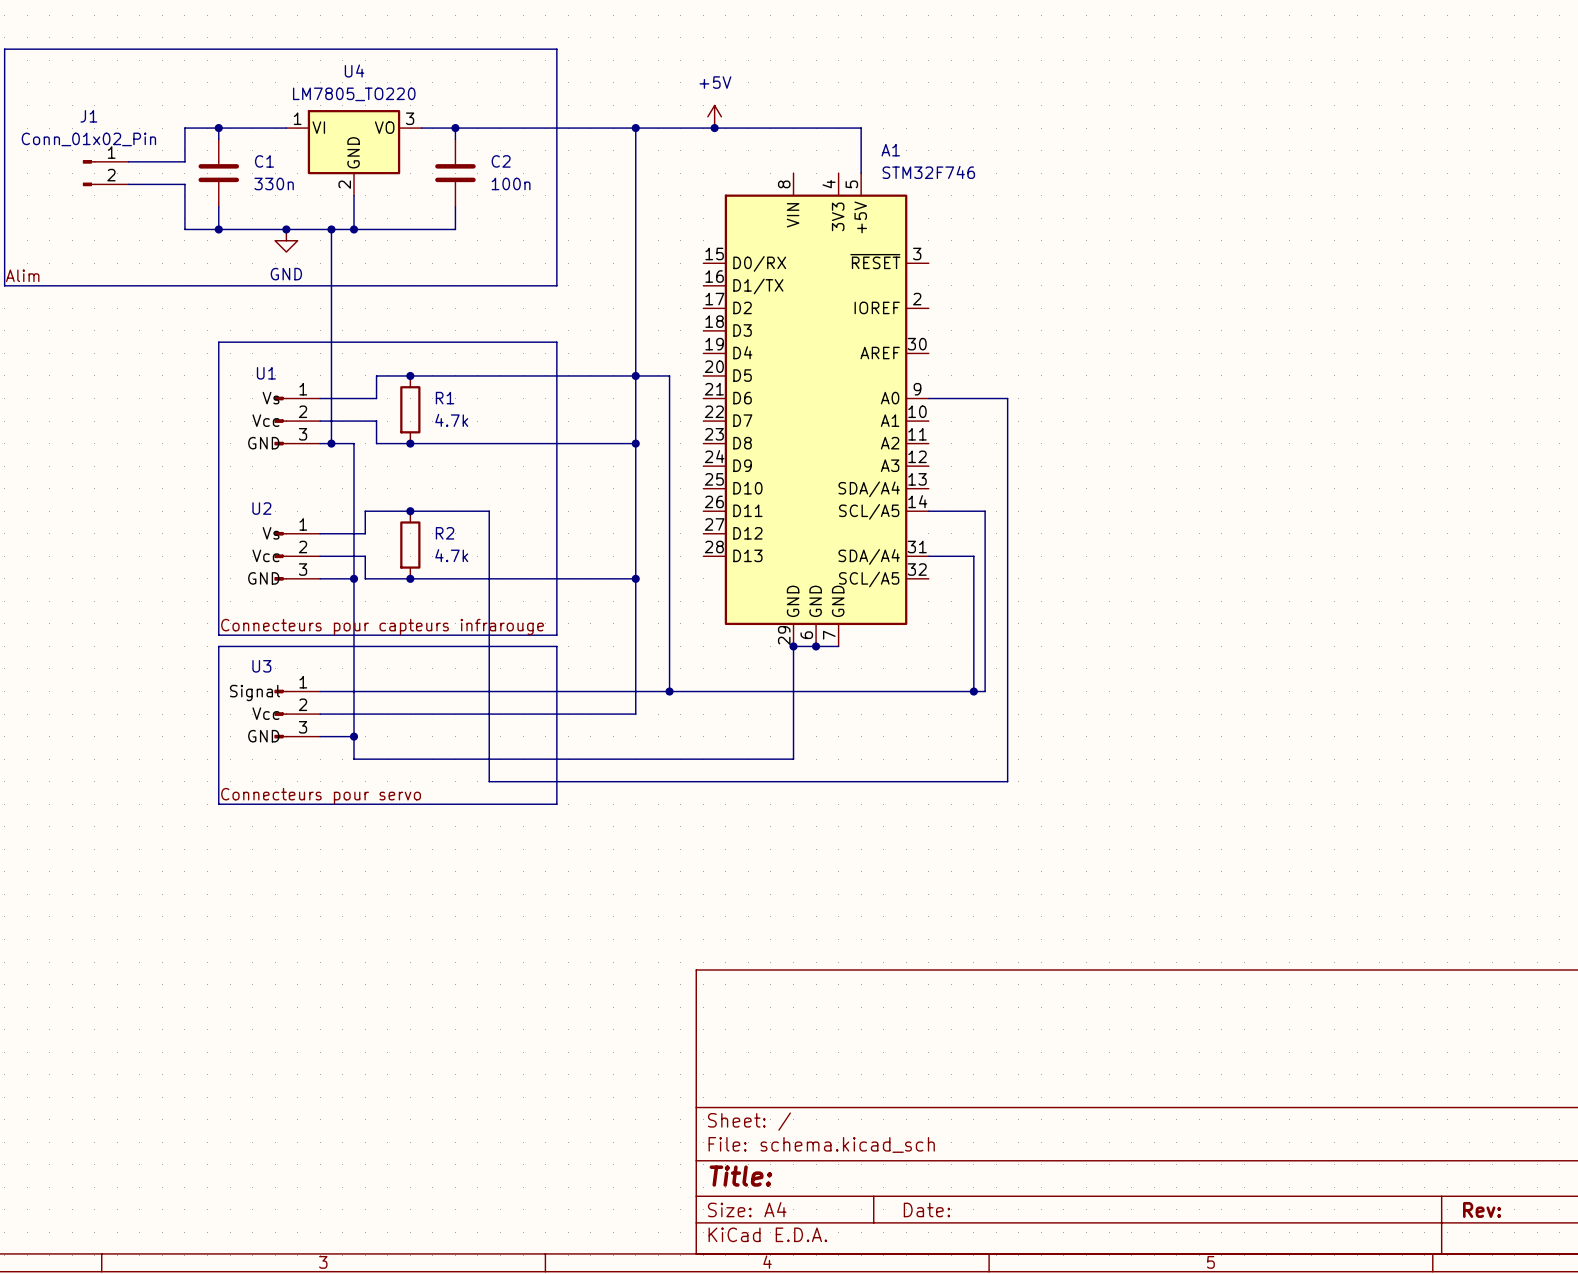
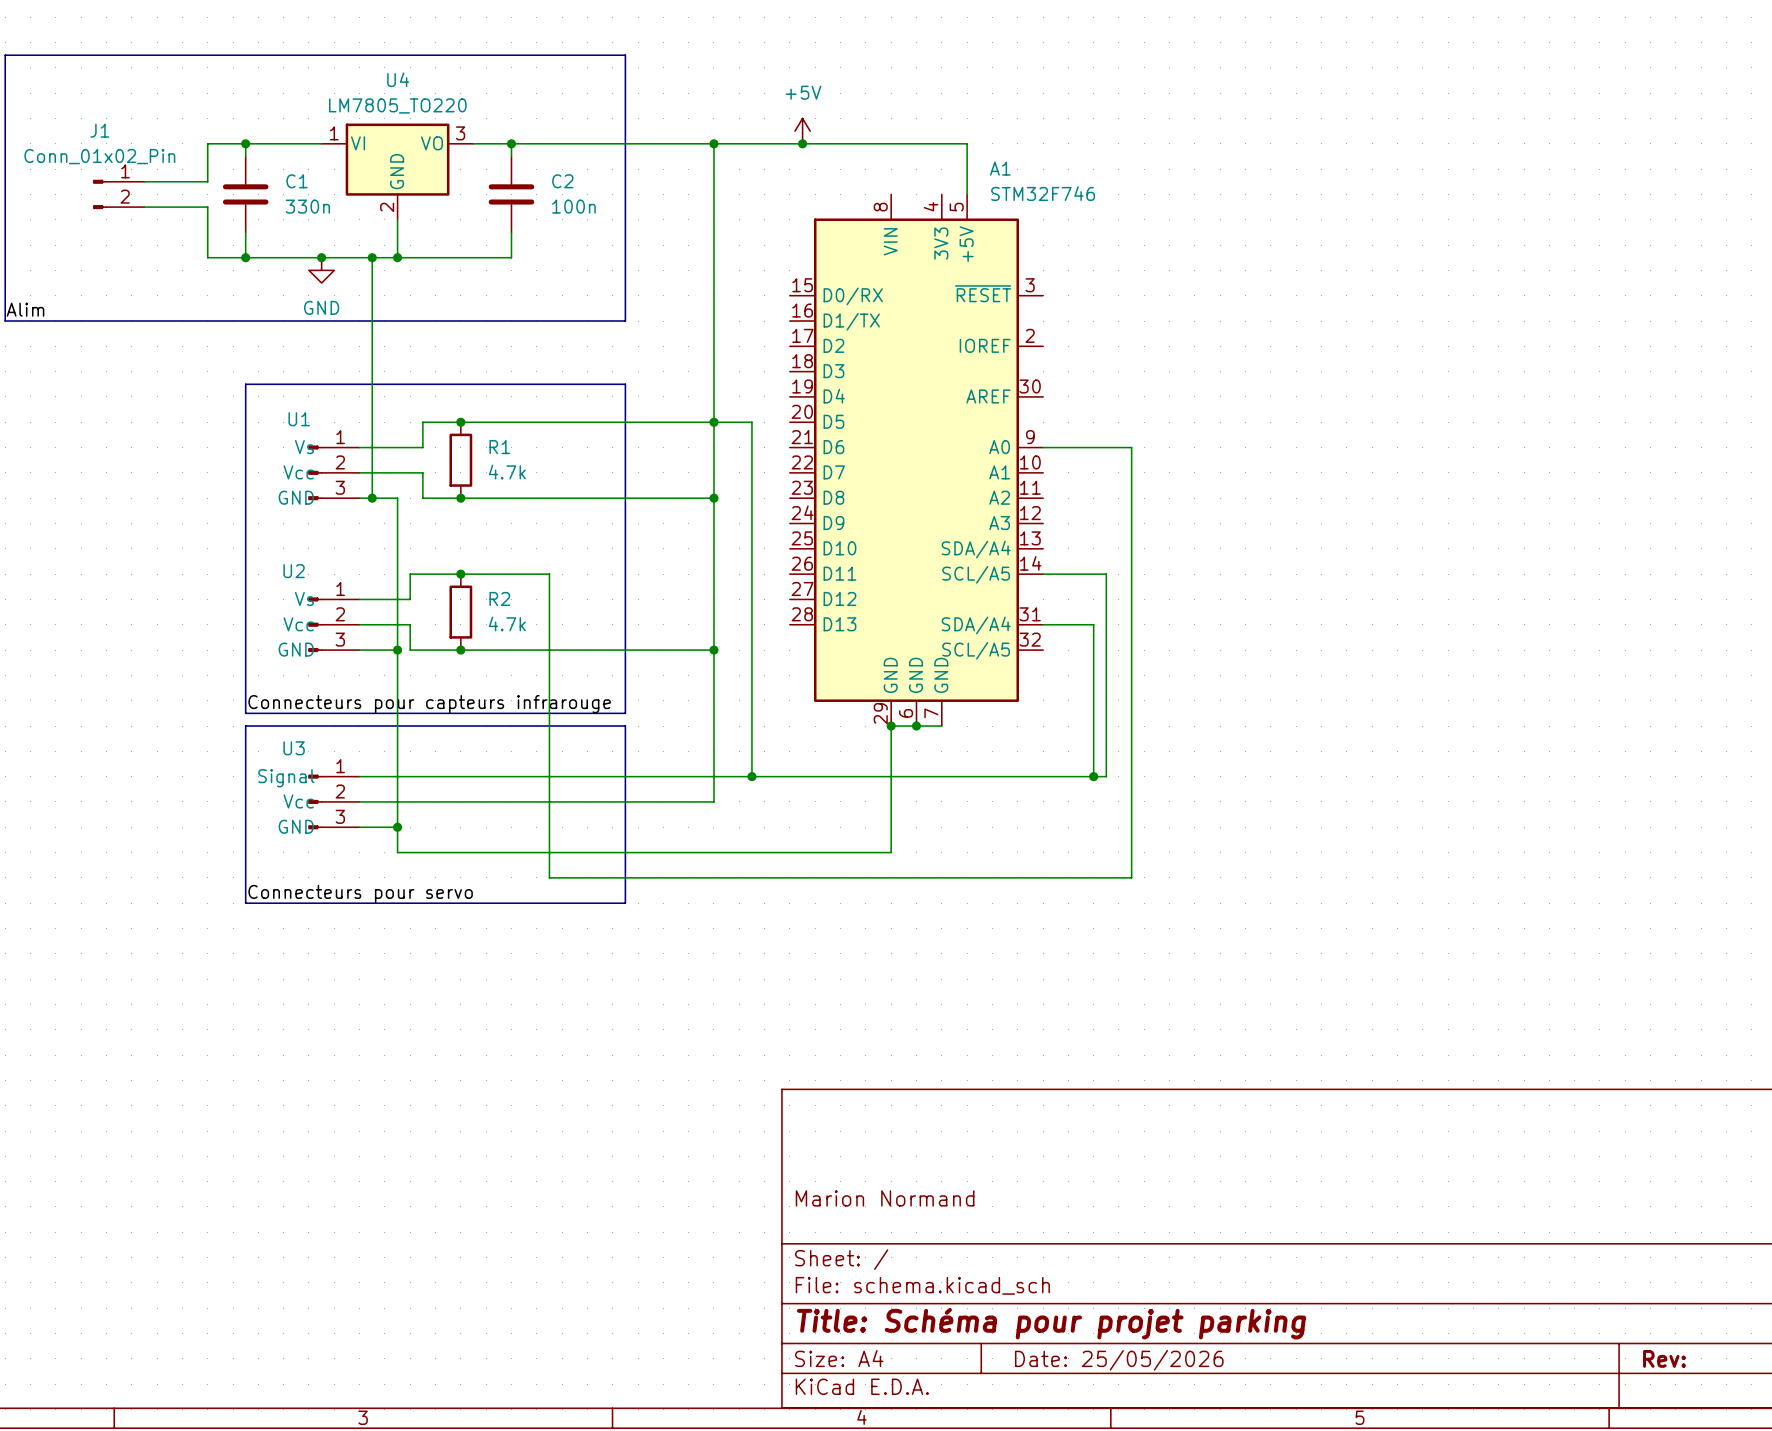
title block: none -> Marion Normand (885, 1198)
title block: Title: (740, 1176) -> Title: Schéma pour projet parking (1051, 1323)
title block: Date: (926, 1209) -> Date: 25/05/2026 (1119, 1360)

